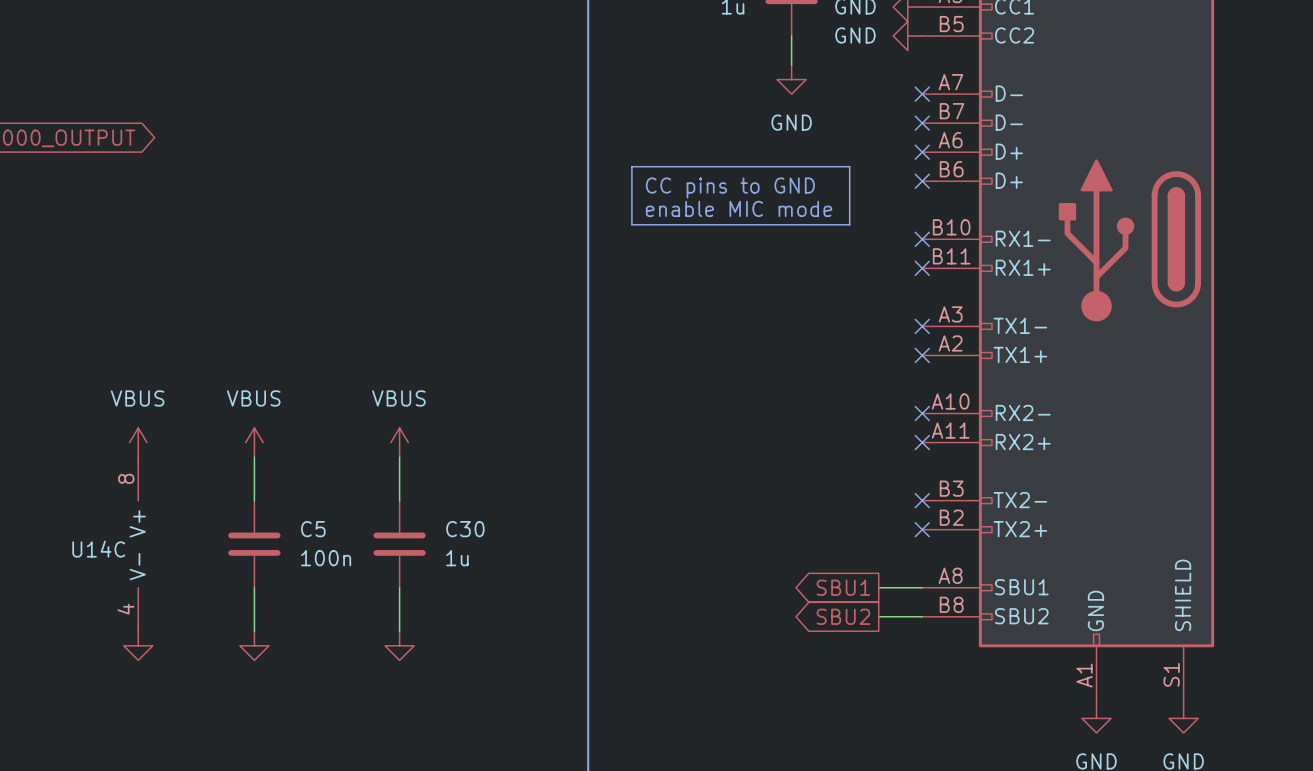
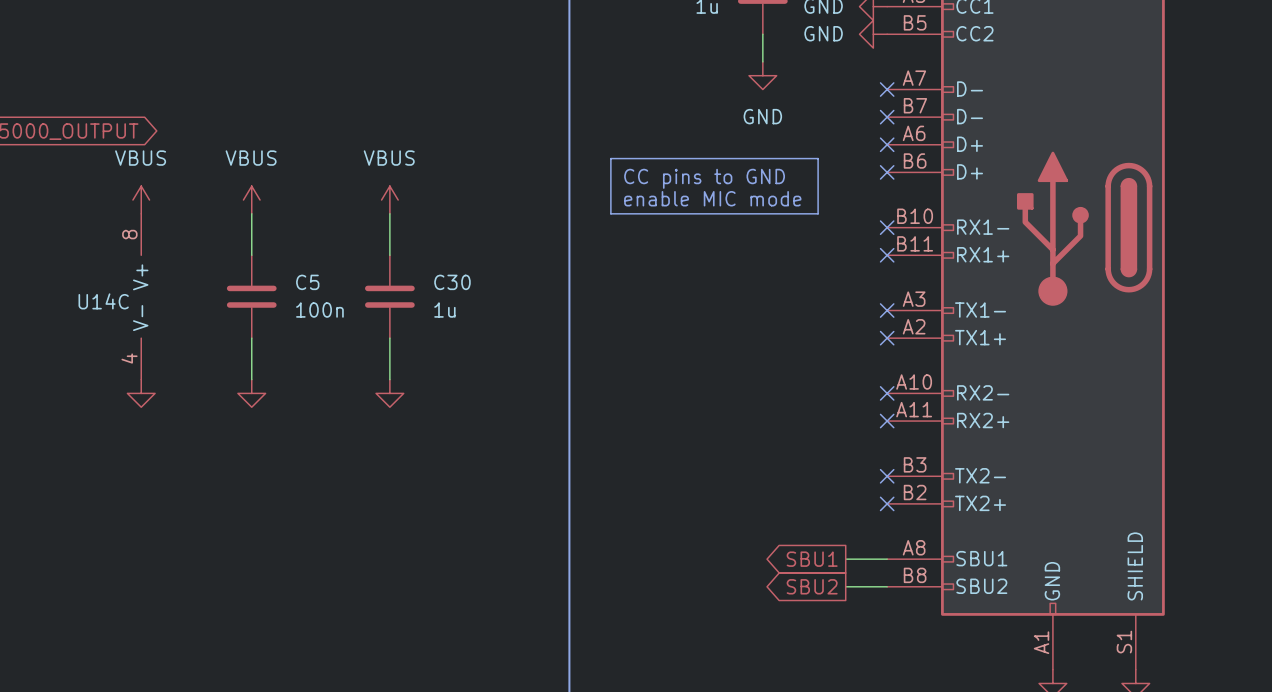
power symbol: none -> VBUS (141, 200)
power symbol: none -> VBUS (251, 200)
power symbol: none -> VBUS (389, 200)
power symbol: none -> (141, 393)
power symbol: none -> (251, 393)
power symbol: none -> (389, 393)
power symbol: VBUS (138, 442) -> none
power symbol: VBUS (254, 442) -> none
power symbol: VBUS (399, 442) -> none
wire: (254, 457) (254, 500) -> (251, 213) (251, 255)
wire: (399, 457) (399, 500) -> (389, 213) (389, 255)
U14C position: (138, 544) -> (141, 296)
C5 position: (254, 544) -> (251, 296)
C30 position: (399, 544) -> (389, 296)
wire: (254, 587) (254, 631) -> (251, 338) (251, 379)
wire: (399, 587) (399, 631) -> (389, 338) (389, 379)
power symbol: (138, 645) -> none
power symbol: (254, 645) -> none
power symbol: (399, 645) -> none

